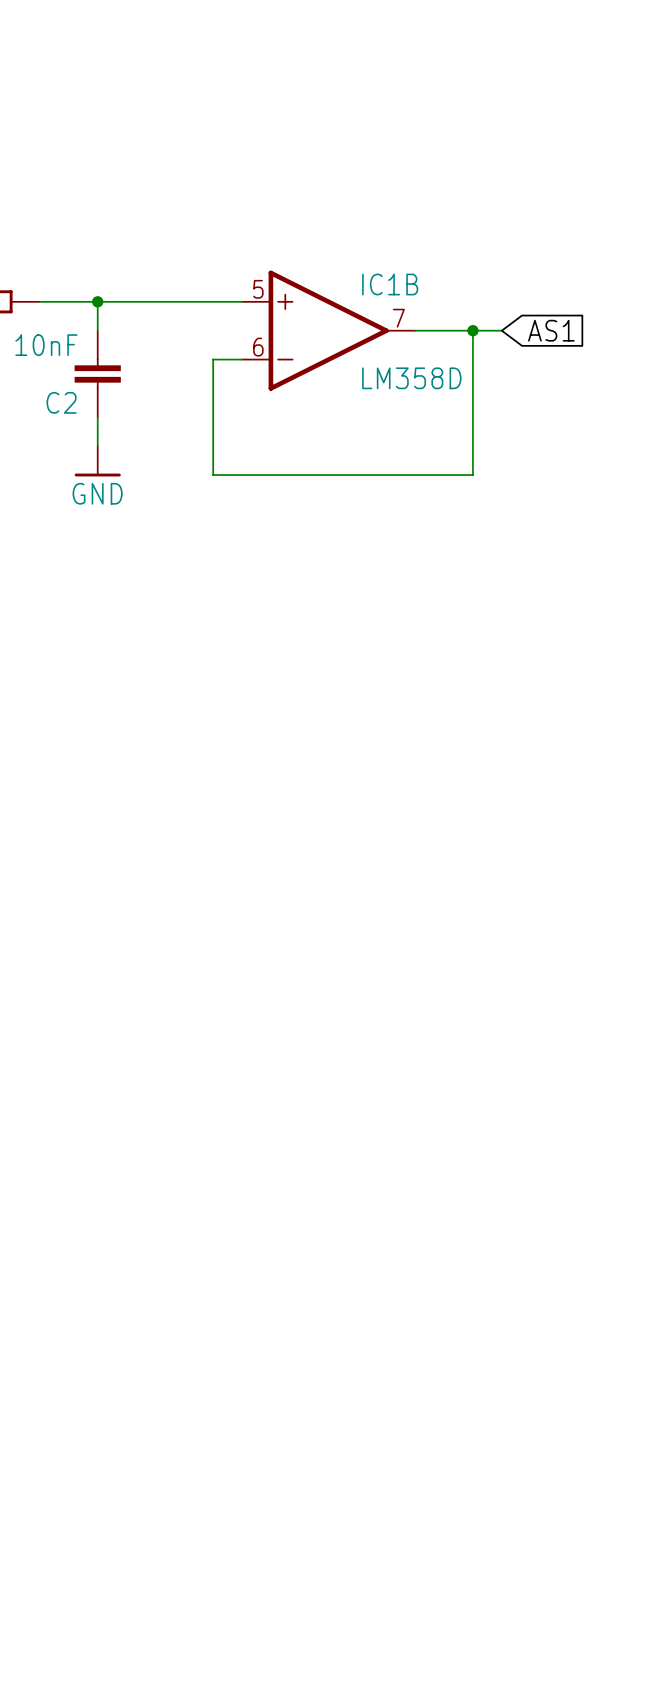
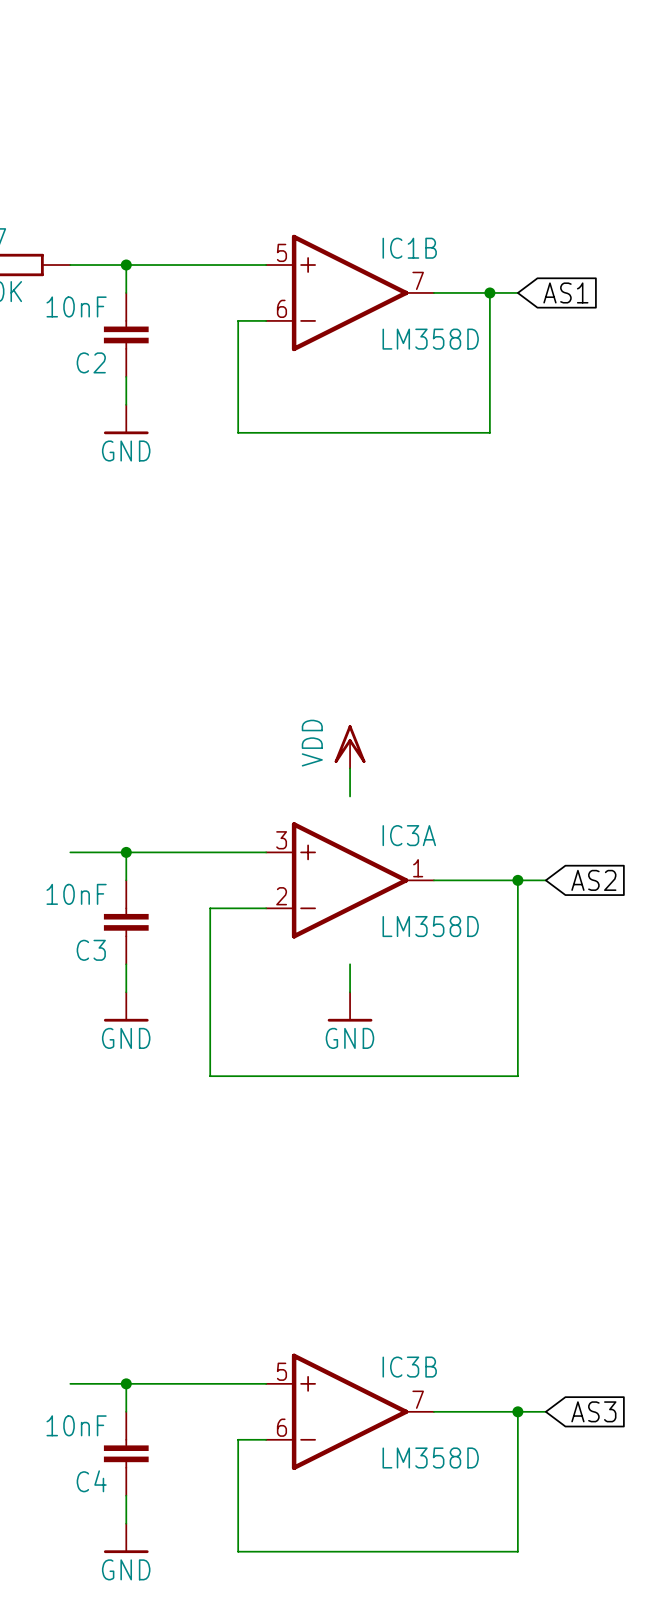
power symbol: none -> VDD (350, 746)
wire: none -> (350, 768) (350, 796)
wire: none -> (70, 852) (266, 852)
wire: none -> (126, 852) (126, 880)
junction: none -> (126, 852)
IC3A: none -> LM358D (350, 880)
wire: none -> (433, 880) (545, 880)
wire: none -> (517, 880) (517, 1076) (210, 1076) (210, 908) (266, 908)
junction: none -> (517, 880)
global label: none -> AS2 (593, 880)
C3: none -> 10nF (126, 922)
wire: none -> (126, 964) (126, 992)
wire: none -> (350, 964) (350, 992)
power symbol: none -> GND (126, 1006)
power symbol: none -> GND (350, 1006)
wire: none -> (70, 1383) (266, 1383)
wire: none -> (126, 1383) (126, 1411)
junction: none -> (126, 1383)
IC3B: none -> LM358D (350, 1411)
wire: none -> (433, 1411) (545, 1411)
wire: none -> (517, 1411) (517, 1551) (238, 1551) (238, 1439) (266, 1439)
junction: none -> (517, 1411)
global label: none -> AS3 (593, 1411)
C4: none -> 10nF (126, 1453)
wire: none -> (126, 1495) (126, 1523)
power symbol: none -> GND (126, 1538)

